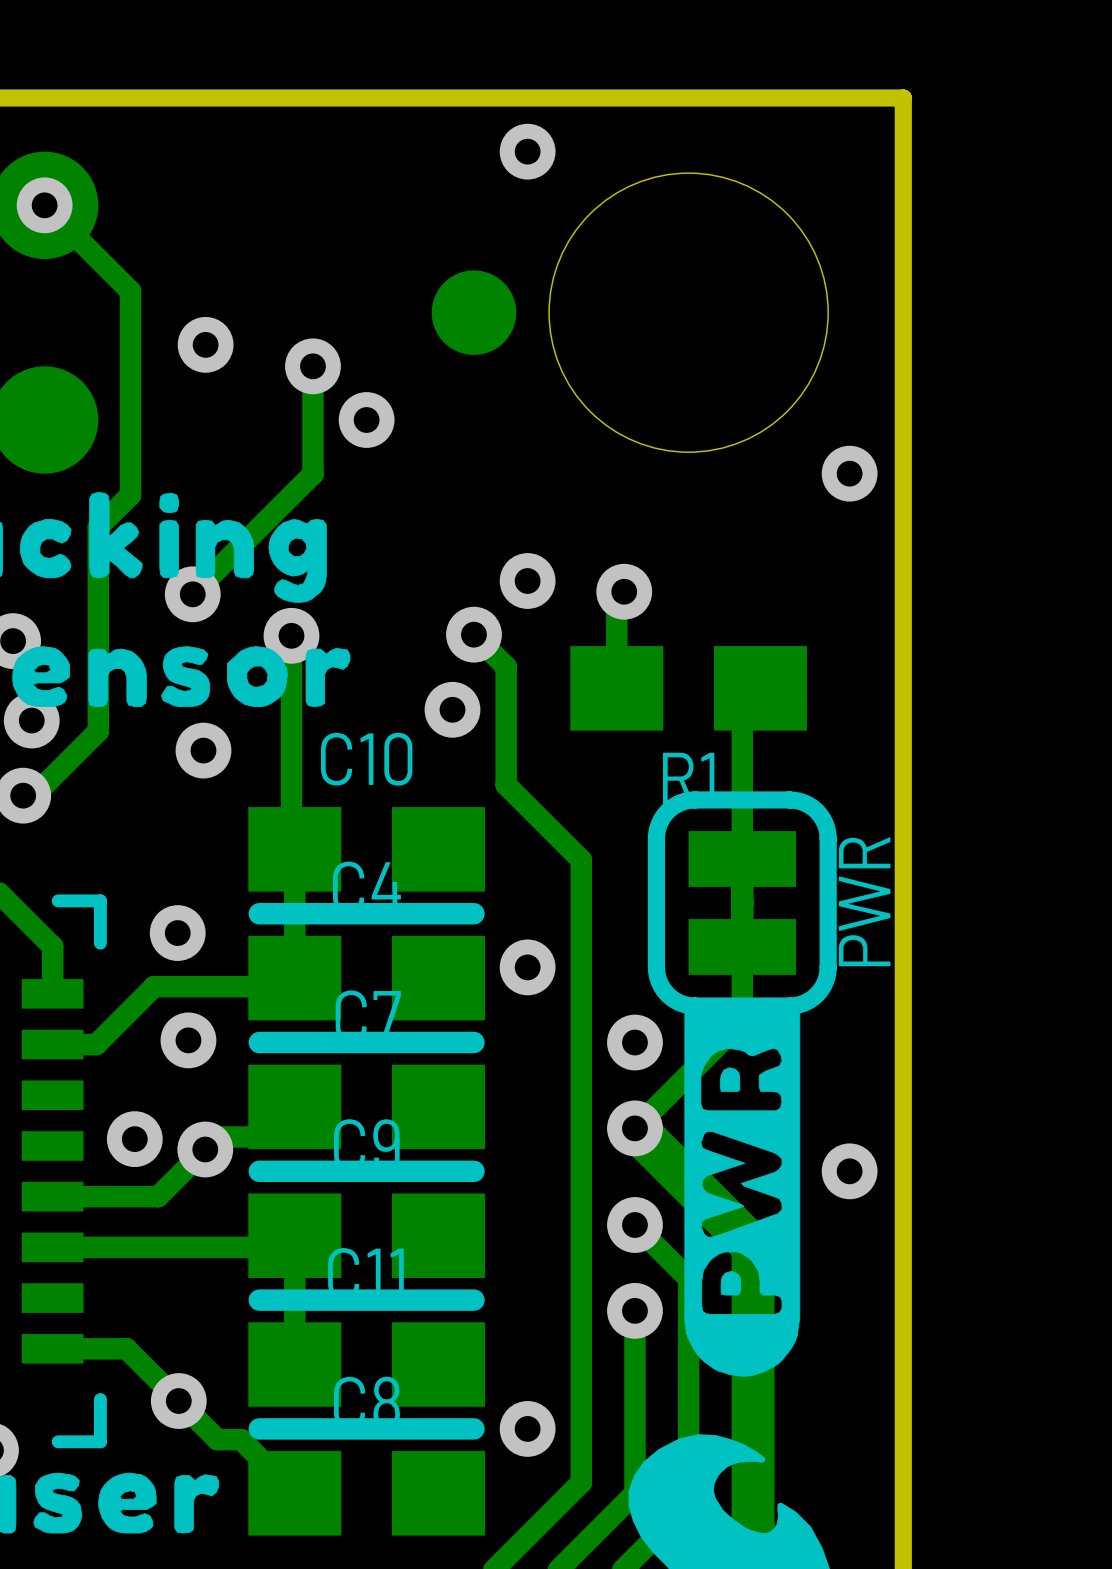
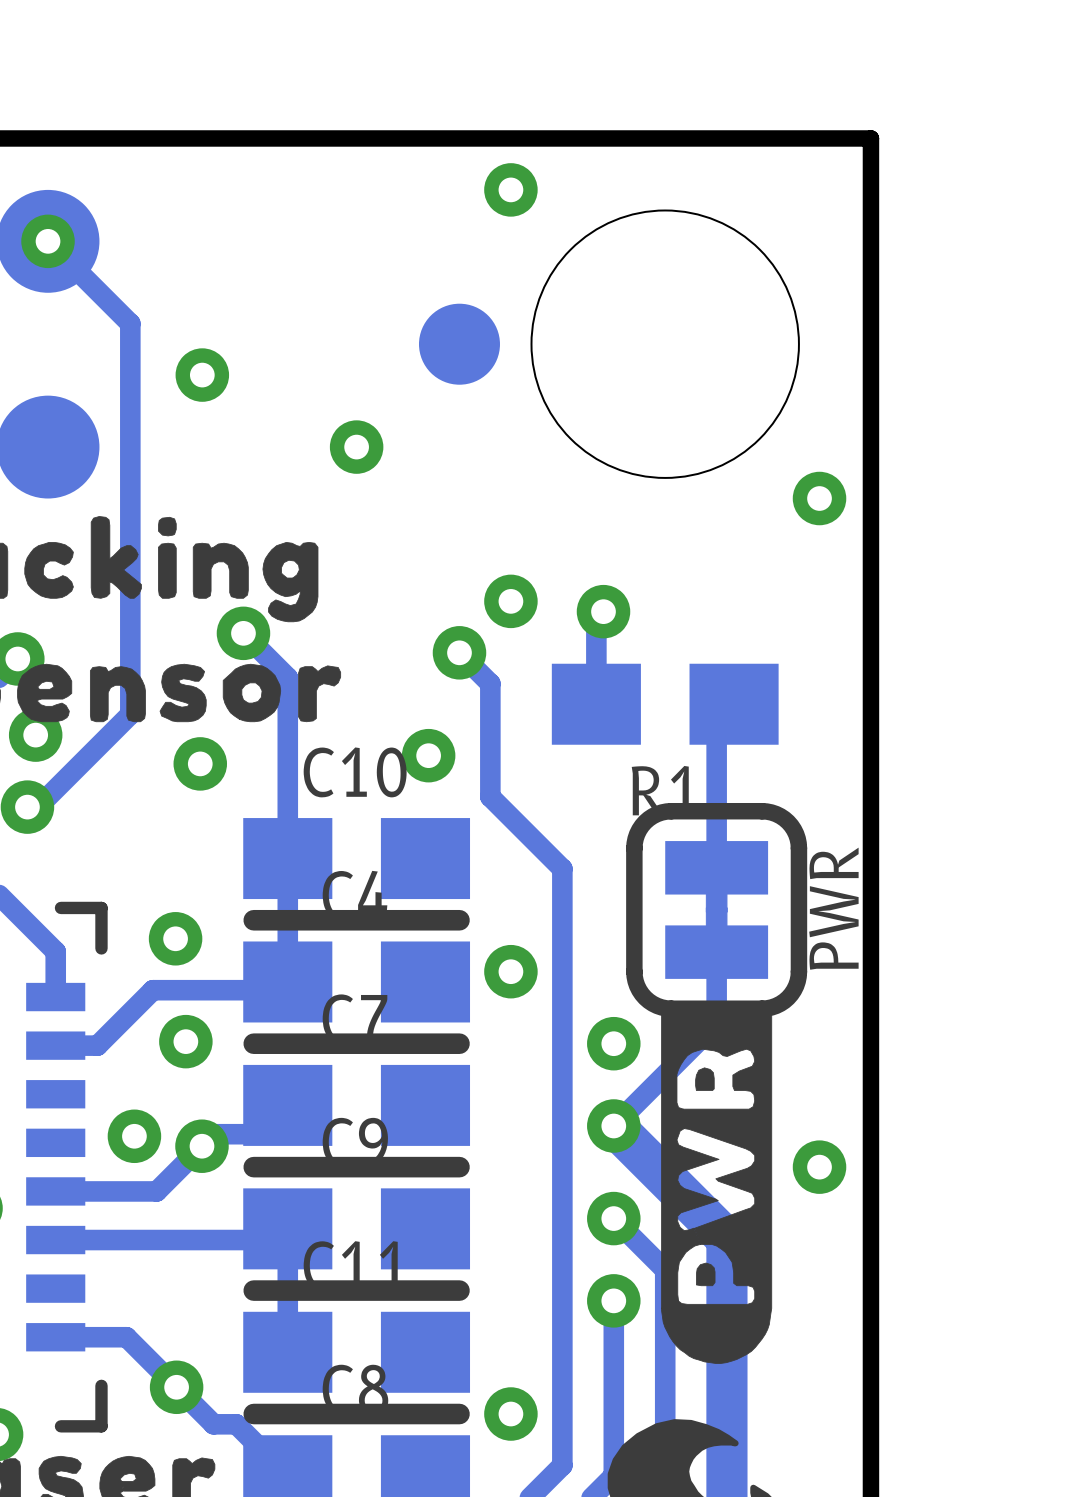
track: (312, 366) (312, 474) (192, 594) -> none
via: (312, 366) -> none
track: (130, 495) (98, 527) (98, 731) -> (130, 519) (130, 714) (99, 745)
via: (192, 594) -> none
track: (291, 635) (291, 846) (294, 849) -> (243, 633) (287, 677) (287, 858)
via position: (291, 635) -> (243, 633)
via position: (452, 709) -> (428, 755)

